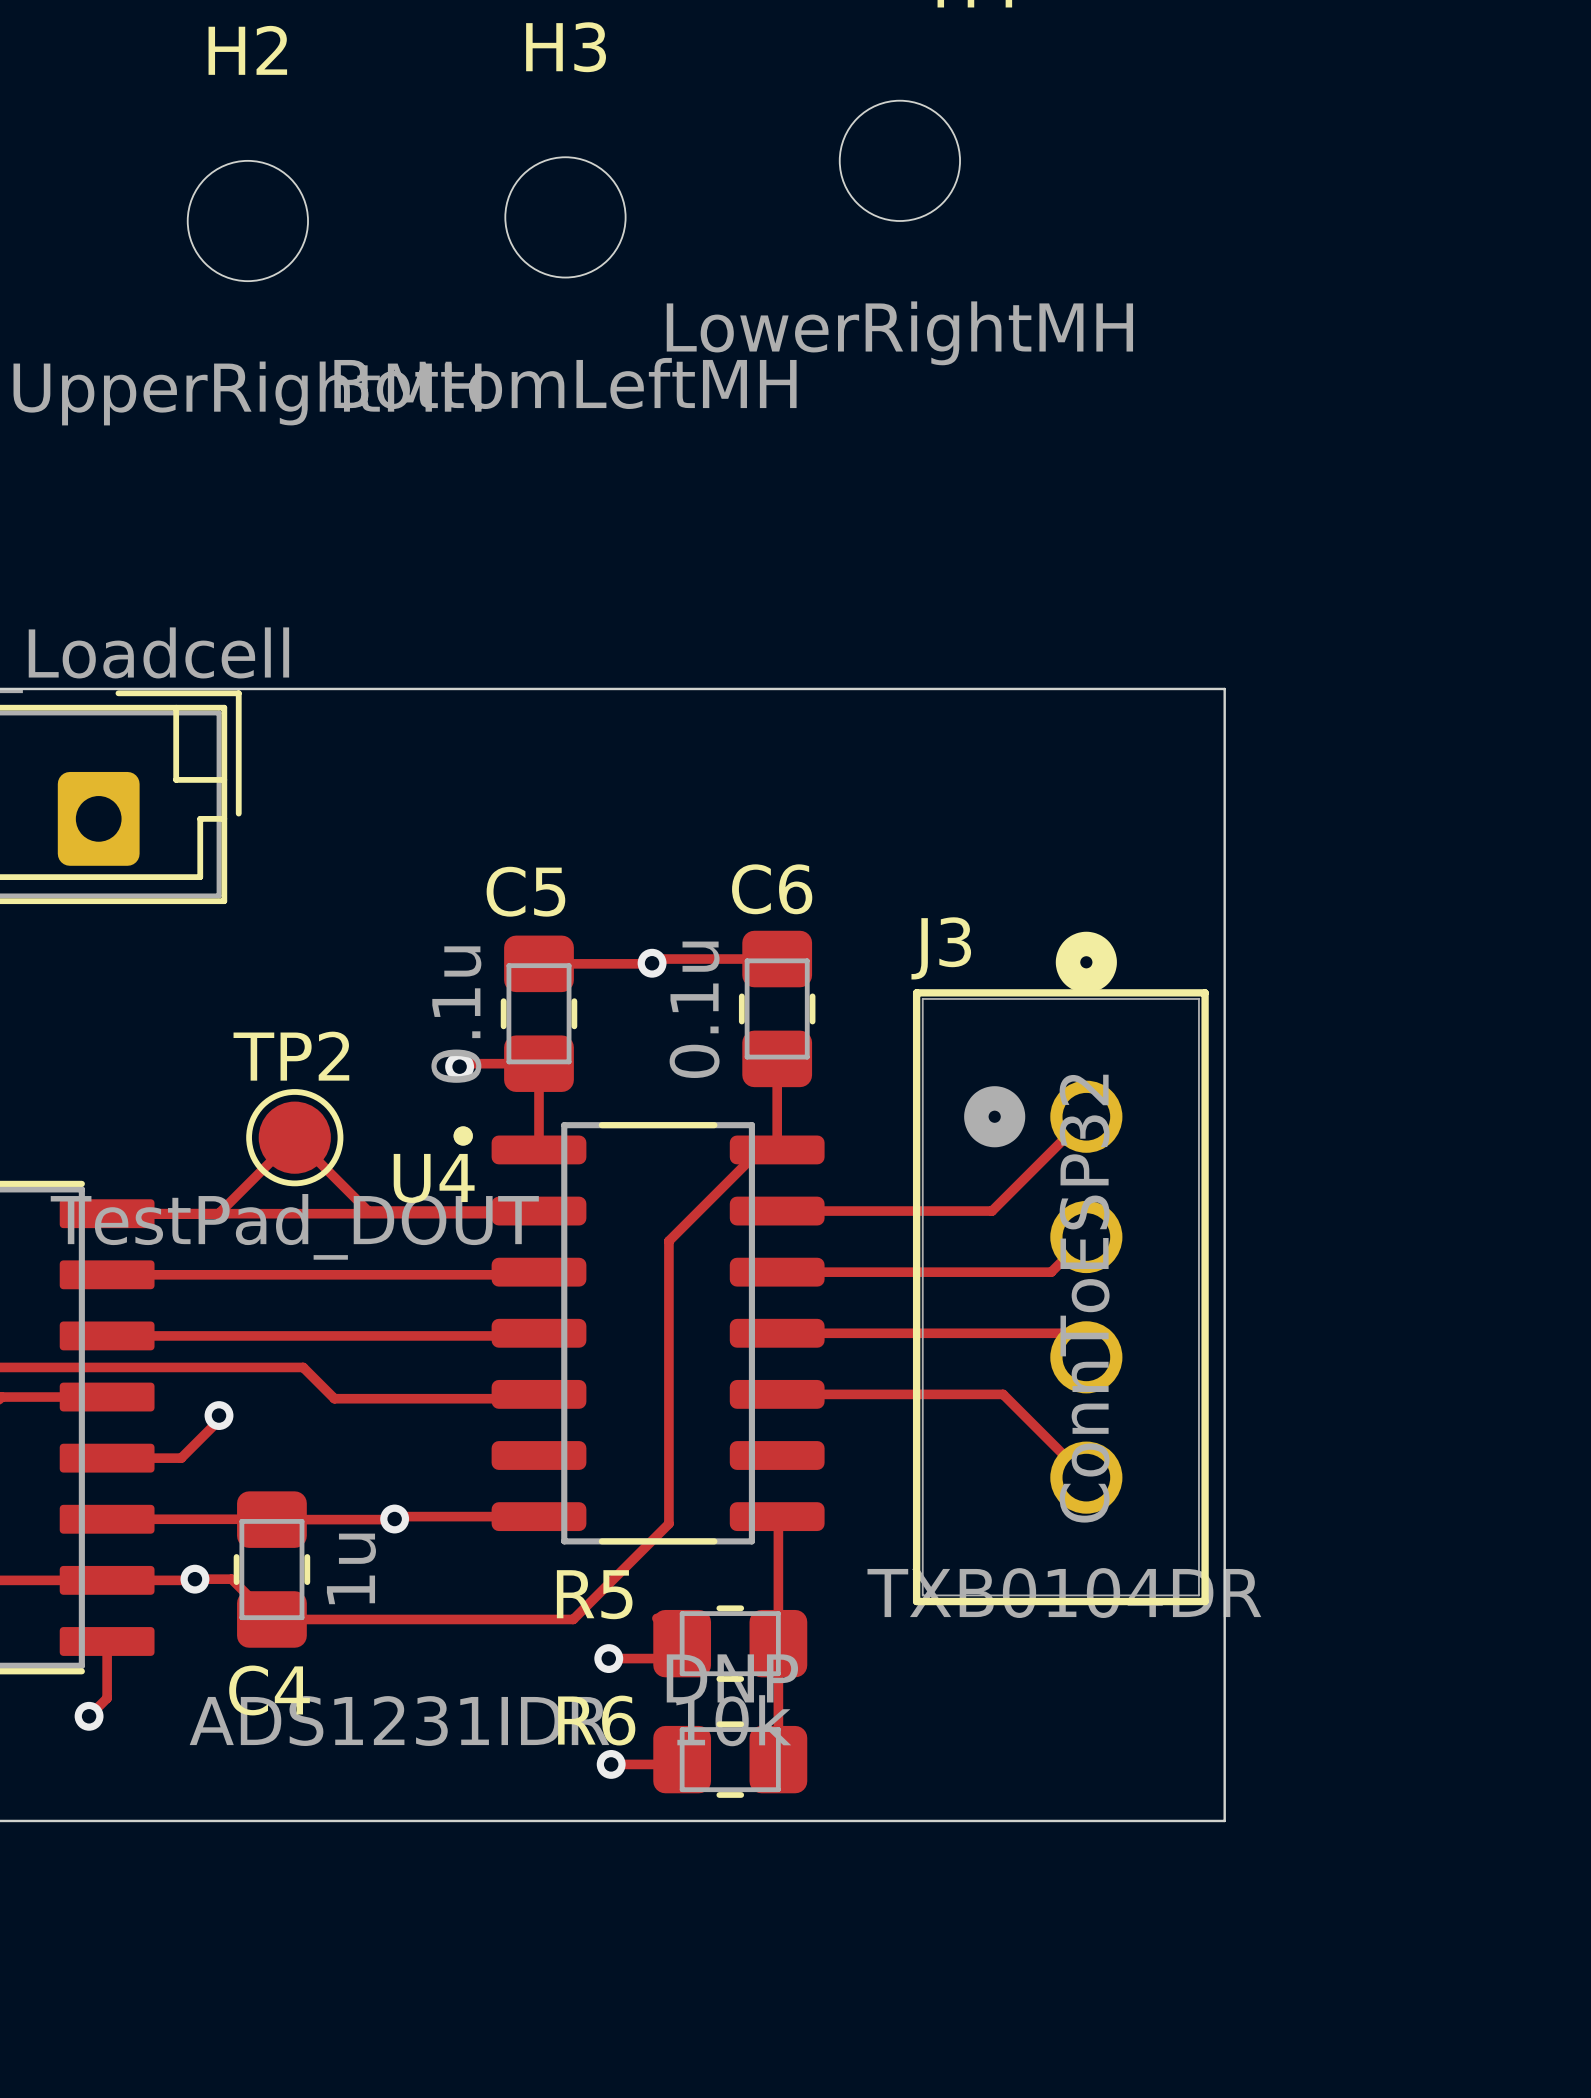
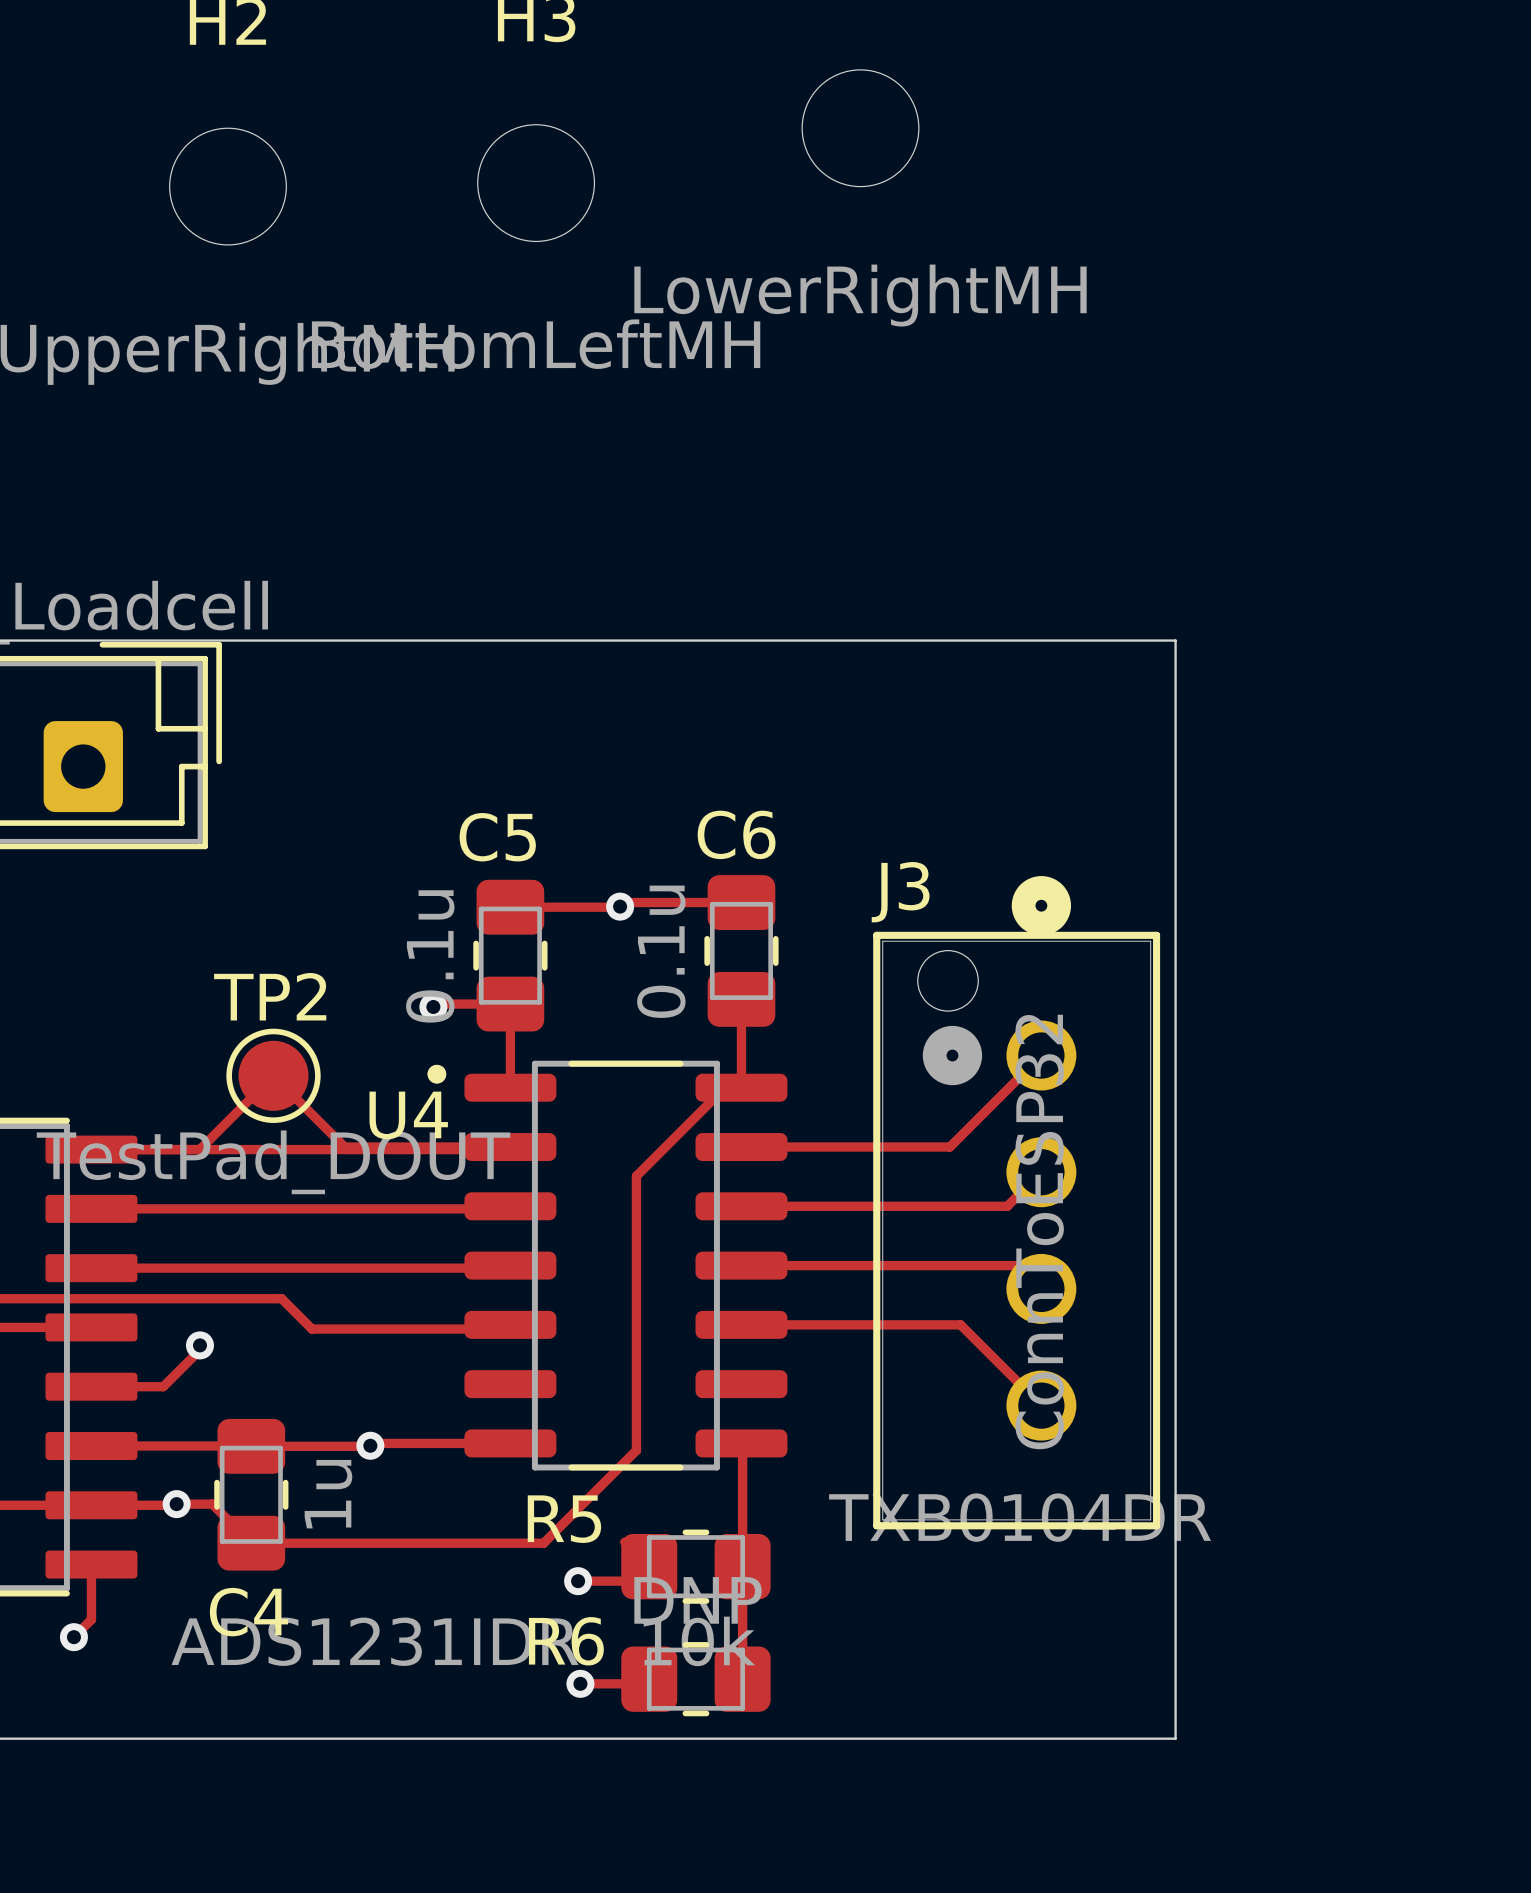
J3 footprint: [912, 931, 1209, 1606] -> [873, 876, 1161, 1530]

